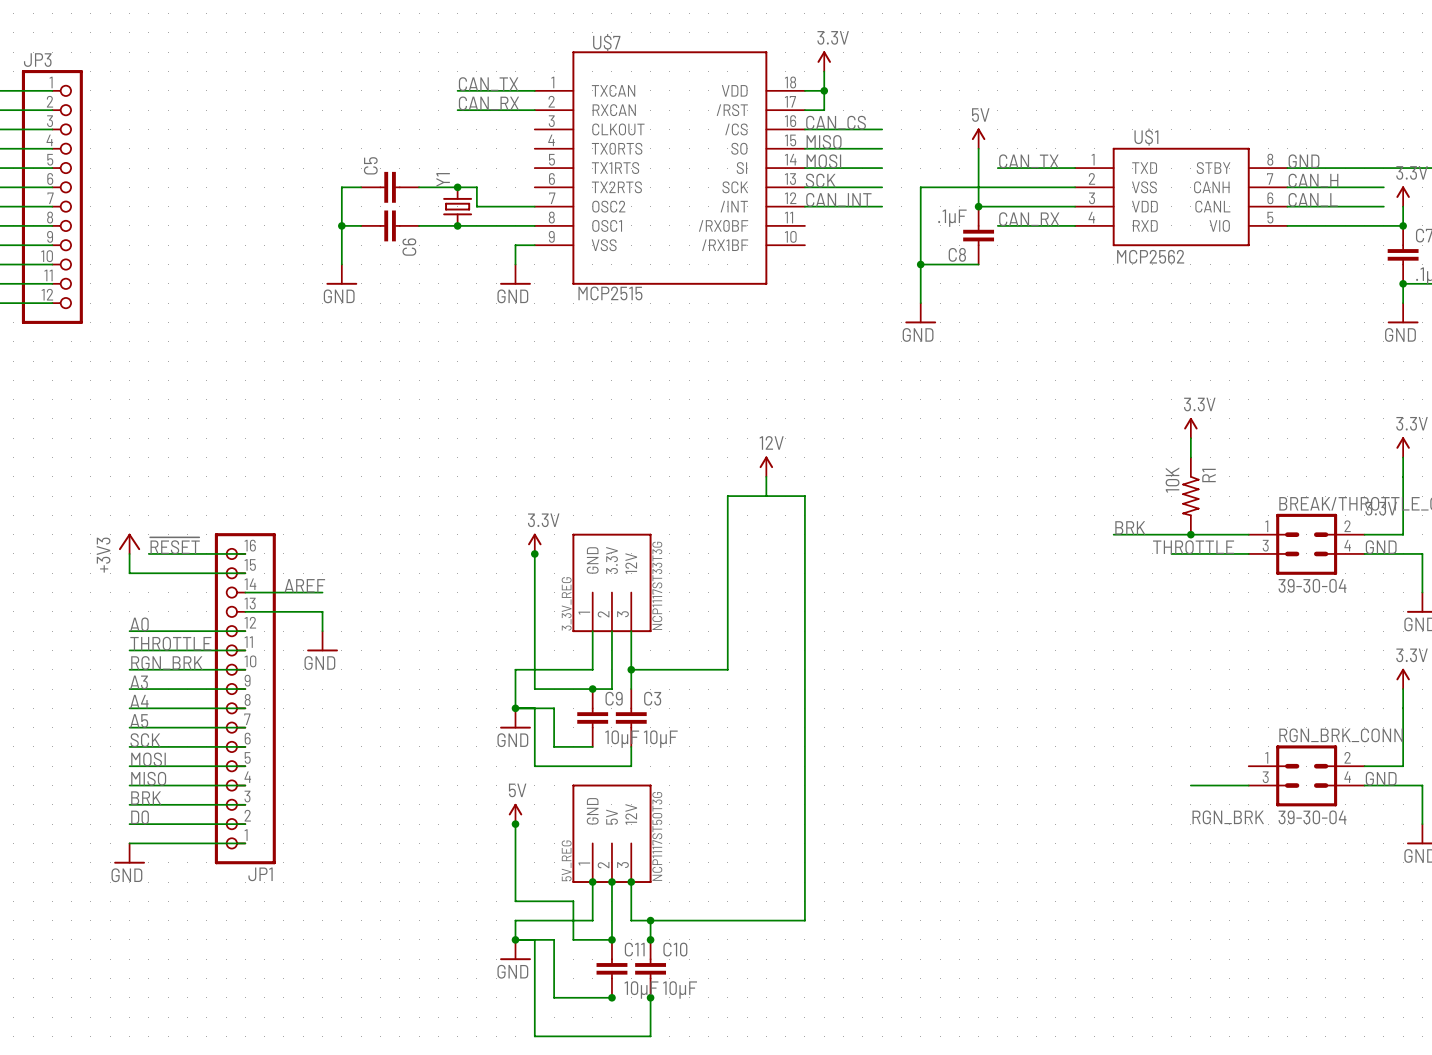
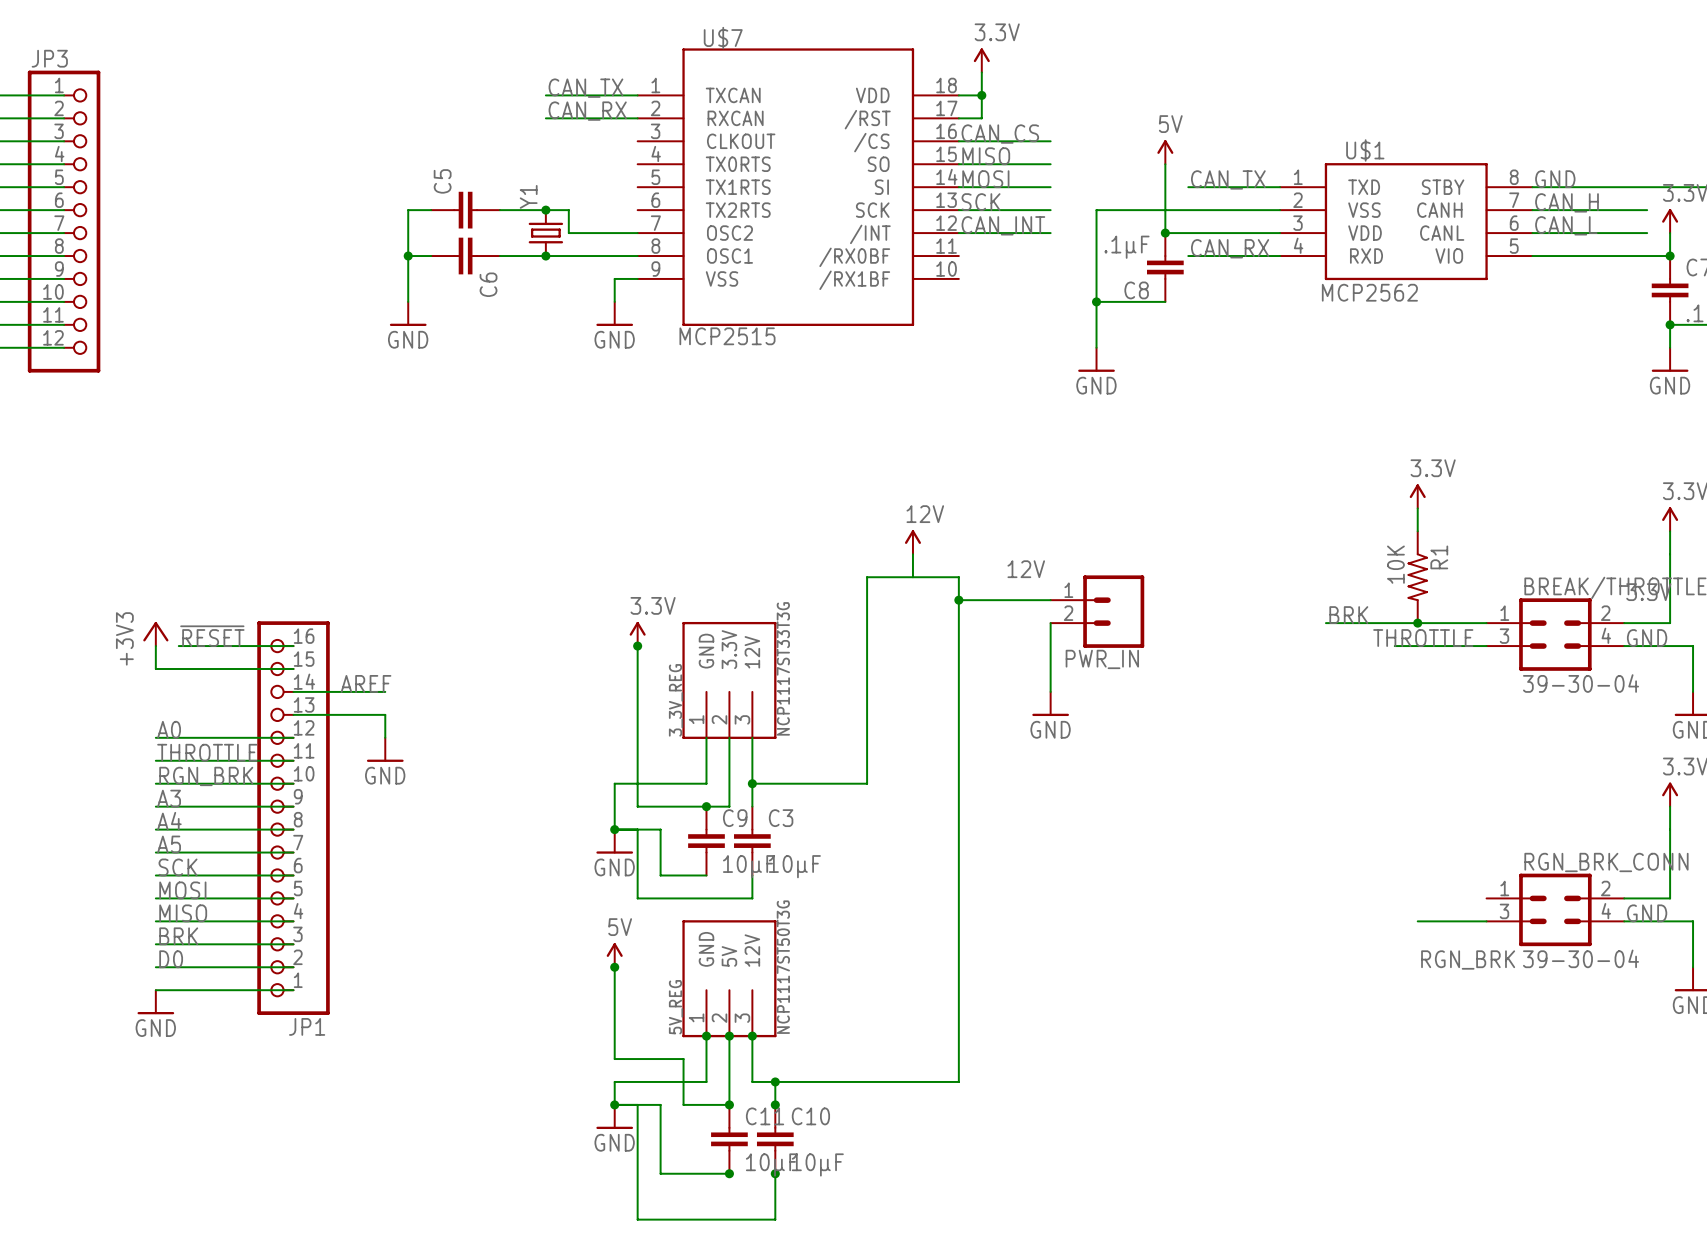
label: none -> 12V (1026, 569)
wire: none -> (958, 600) (1050, 600)
junction: none -> (958, 600)
PWR_IN: none -> (1097, 611)
wire: none -> (1050, 623) (1050, 691)
power symbol: none -> GND (1050, 703)

